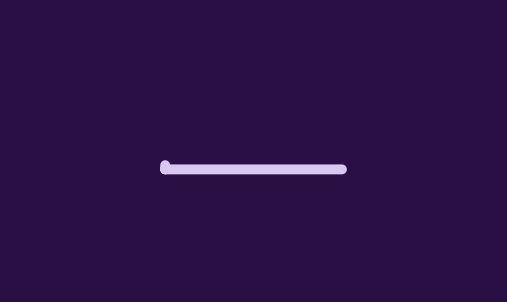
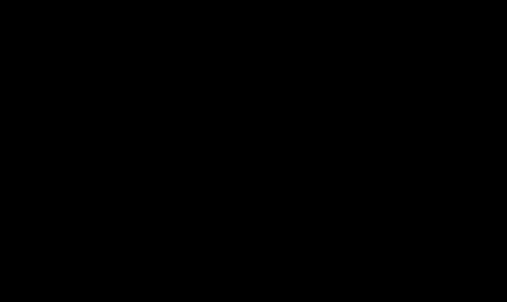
board edge: (165, 165) (165, 169) (341, 169) -> none

